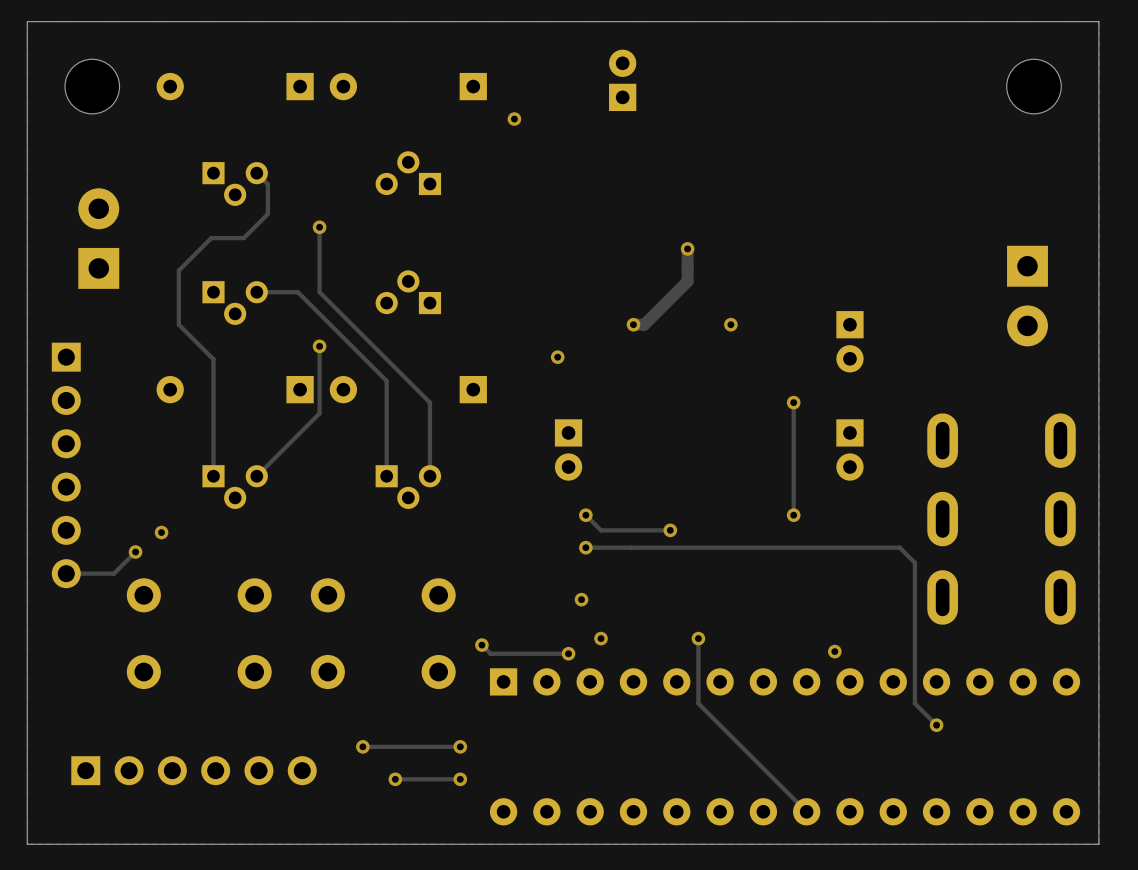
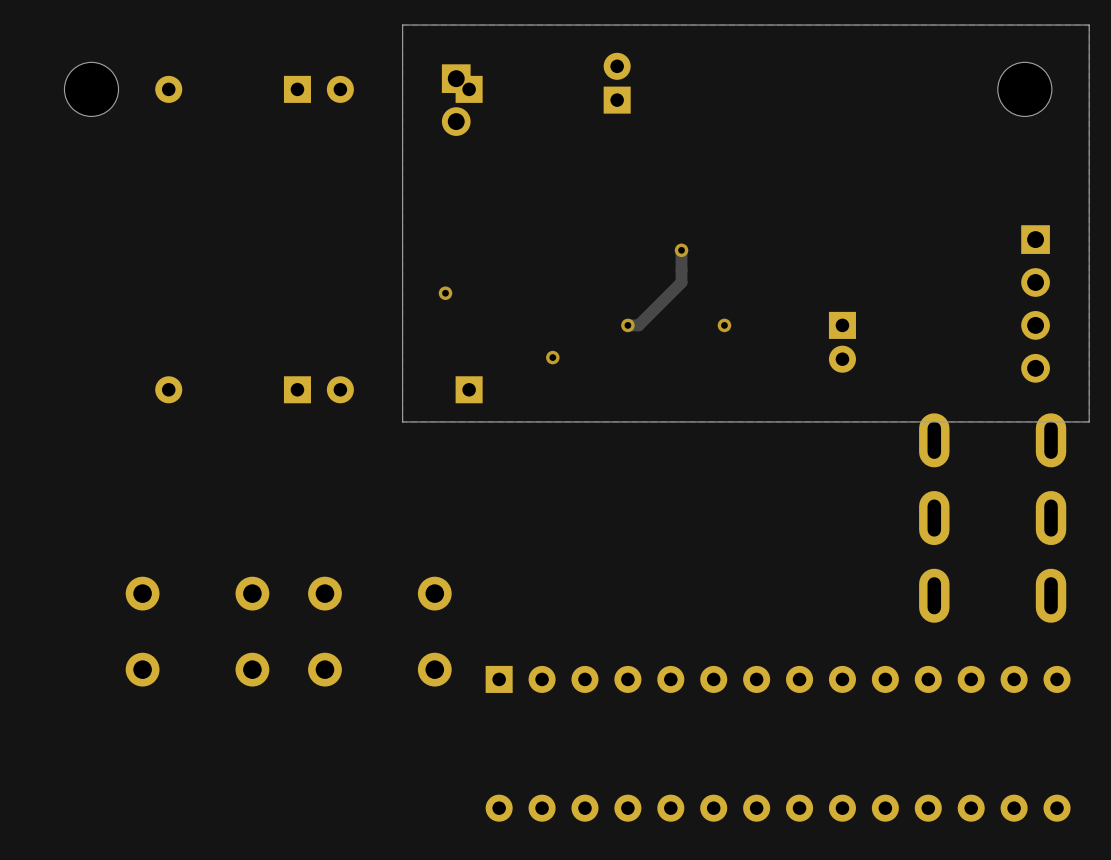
board edge: (406, 21) (27, 21) (27, 844) (1098, 844) (1098, 422) -> (402, 25) (402, 421) (1089, 421)
part: none -> (456, 100)
via: (514, 119) -> none
track: (256, 173) (267, 184) (267, 214) (243, 238) (211, 238) (178, 270) (178, 324) (213, 359) (213, 476) -> none
part: (408, 173) -> none
part: (235, 183) -> none
track: (319, 227) (319, 292) (429, 402) (429, 476) -> none
via: (319, 227) -> none
part: (98, 238) -> none
track: (256, 292) (297, 292) (386, 380) (386, 476) -> none
part: (408, 292) -> none
via: none -> (445, 293)
part: (1027, 296) -> none
part: (235, 303) -> none
part: none -> (1035, 303)
track: (319, 346) (319, 413) (256, 476) -> none
via: (319, 346) -> none
track: (793, 402) (793, 515) -> none
via: (793, 402) -> none
part: (568, 449) -> none
part: (849, 449) -> none
part: (66, 465) -> none
part: (235, 487) -> none
part: (408, 487) -> none
track: (585, 515) (601, 530) (670, 530) -> none
via: (585, 515) -> none
via: (793, 515) -> none
via: (670, 530) -> none
via: (161, 532) -> none
track: (585, 547) (899, 547) (914, 562) (914, 703) (936, 725) -> none
via: (585, 547) -> none
track: (135, 552) (113, 573) (66, 573) -> none
via: (135, 552) -> none
via: (581, 599) -> none
via: (601, 638) -> none
track: (698, 638) (698, 703) (806, 811) -> none
via: (698, 638) -> none
track: (481, 645) (490, 653) (568, 653) -> none
via: (481, 645) -> none
via: (834, 651) -> none
via: (568, 653) -> none
via: (936, 725) -> none
via: (362, 746) -> none
track: (460, 746) (362, 746) -> none
via: (460, 746) -> none
part: (194, 770) -> none
via: (395, 779) -> none
track: (460, 779) (395, 779) -> none
via: (460, 779) -> none

